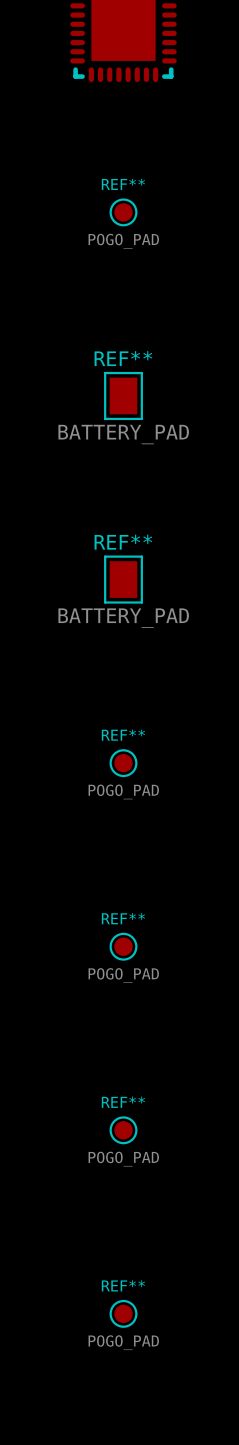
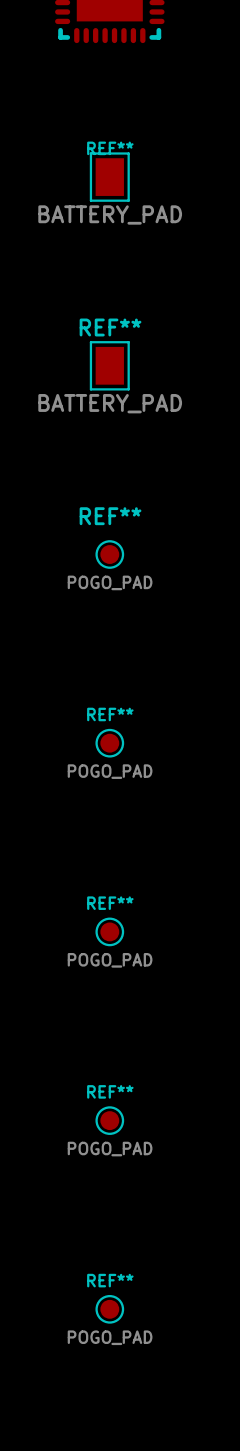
REF** footprint: [109, 198, 138, 227] -> [89, 152, 130, 202]
REF** value: POGO_PAD (123, 241) -> BATTERY_PAD (110, 214)
REF** footprint: [104, 555, 143, 604] -> [95, 540, 125, 569]
REF** value: BATTERY_PAD (123, 618) -> POGO_PAD (110, 582)

